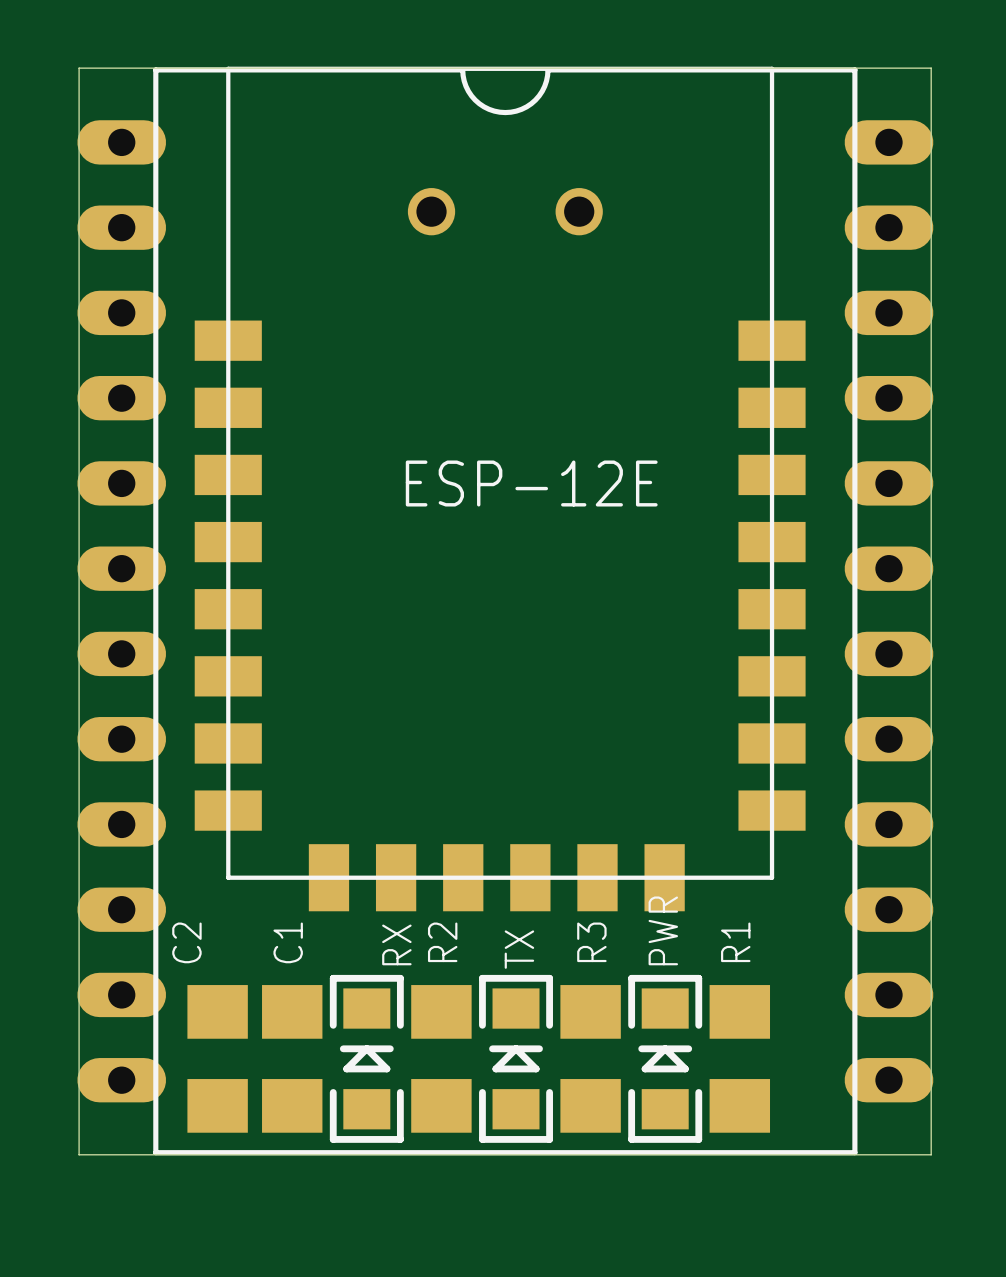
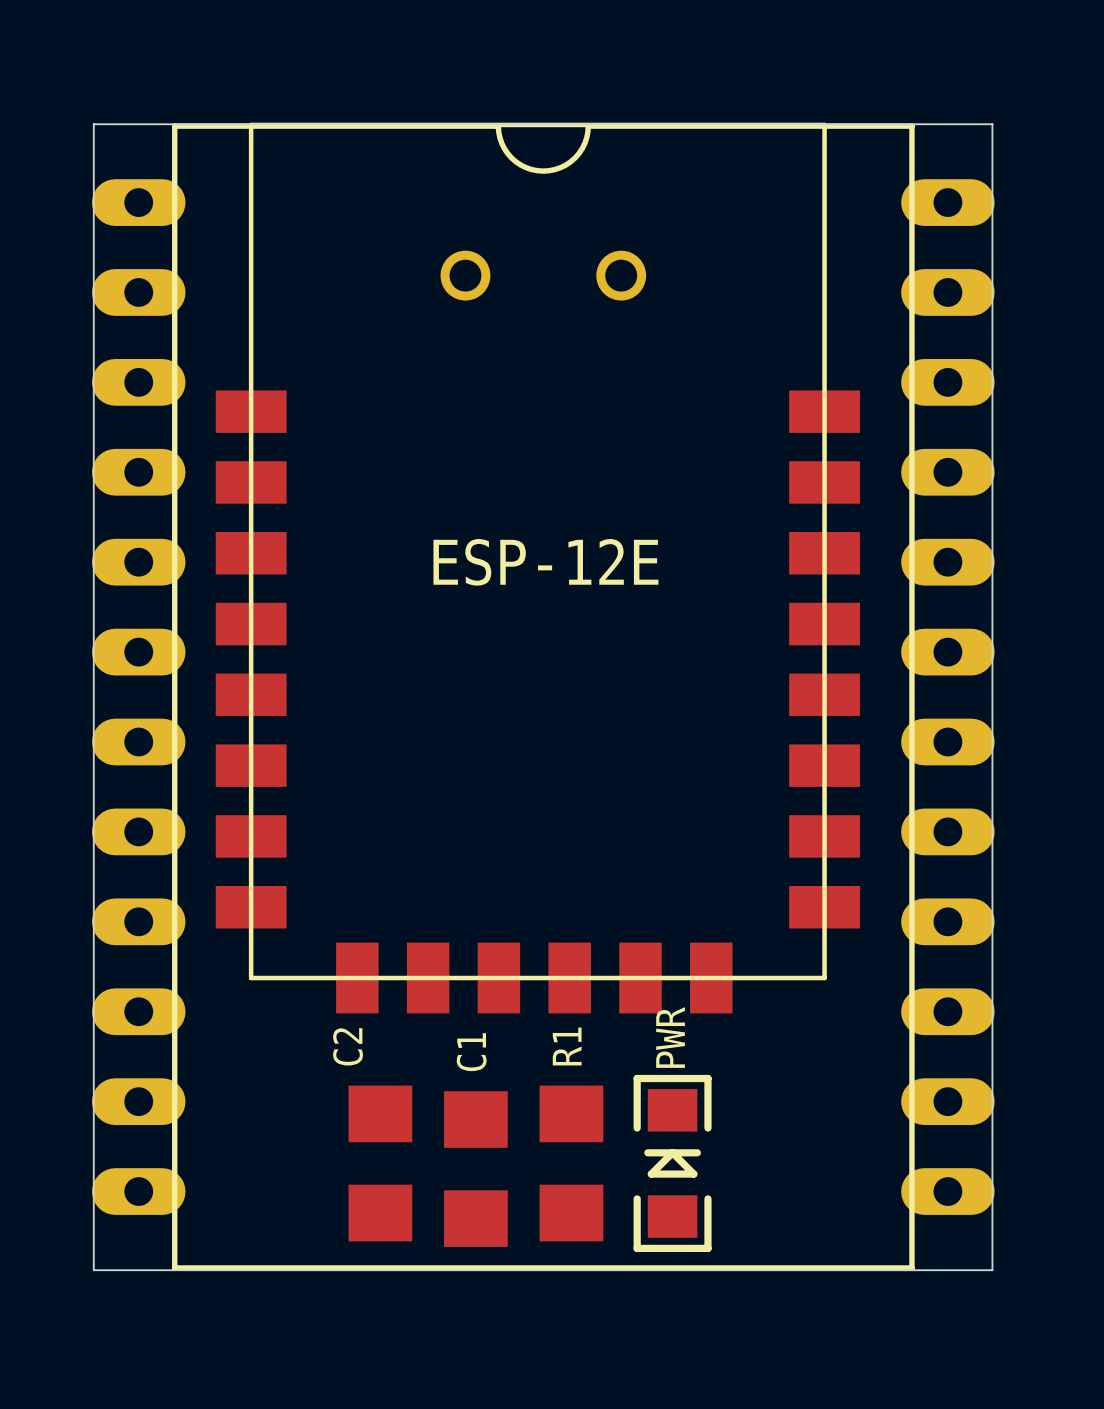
R2 name: R2 (442, 942) -> C1 (471, 1052)
C2 position: (217, 1058) -> (380, 1163)
C1: (292, 1058) -> none
RX: (366, 1058) -> none
TX: (516, 1058) -> none
R3: (590, 1058) -> none
PWR position: (665, 1058) -> (672, 1163)
R1 position: (739, 1058) -> (571, 1163)

